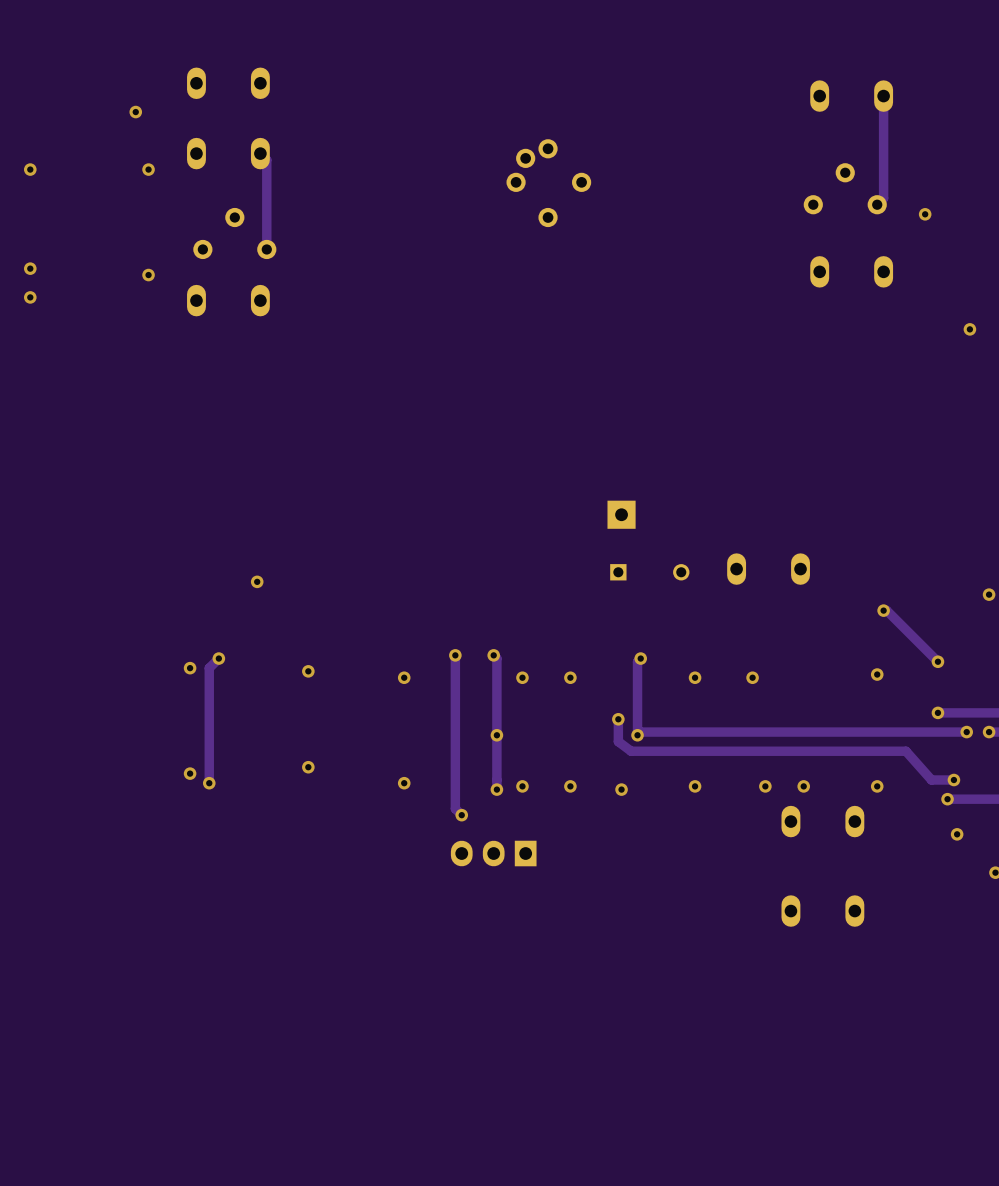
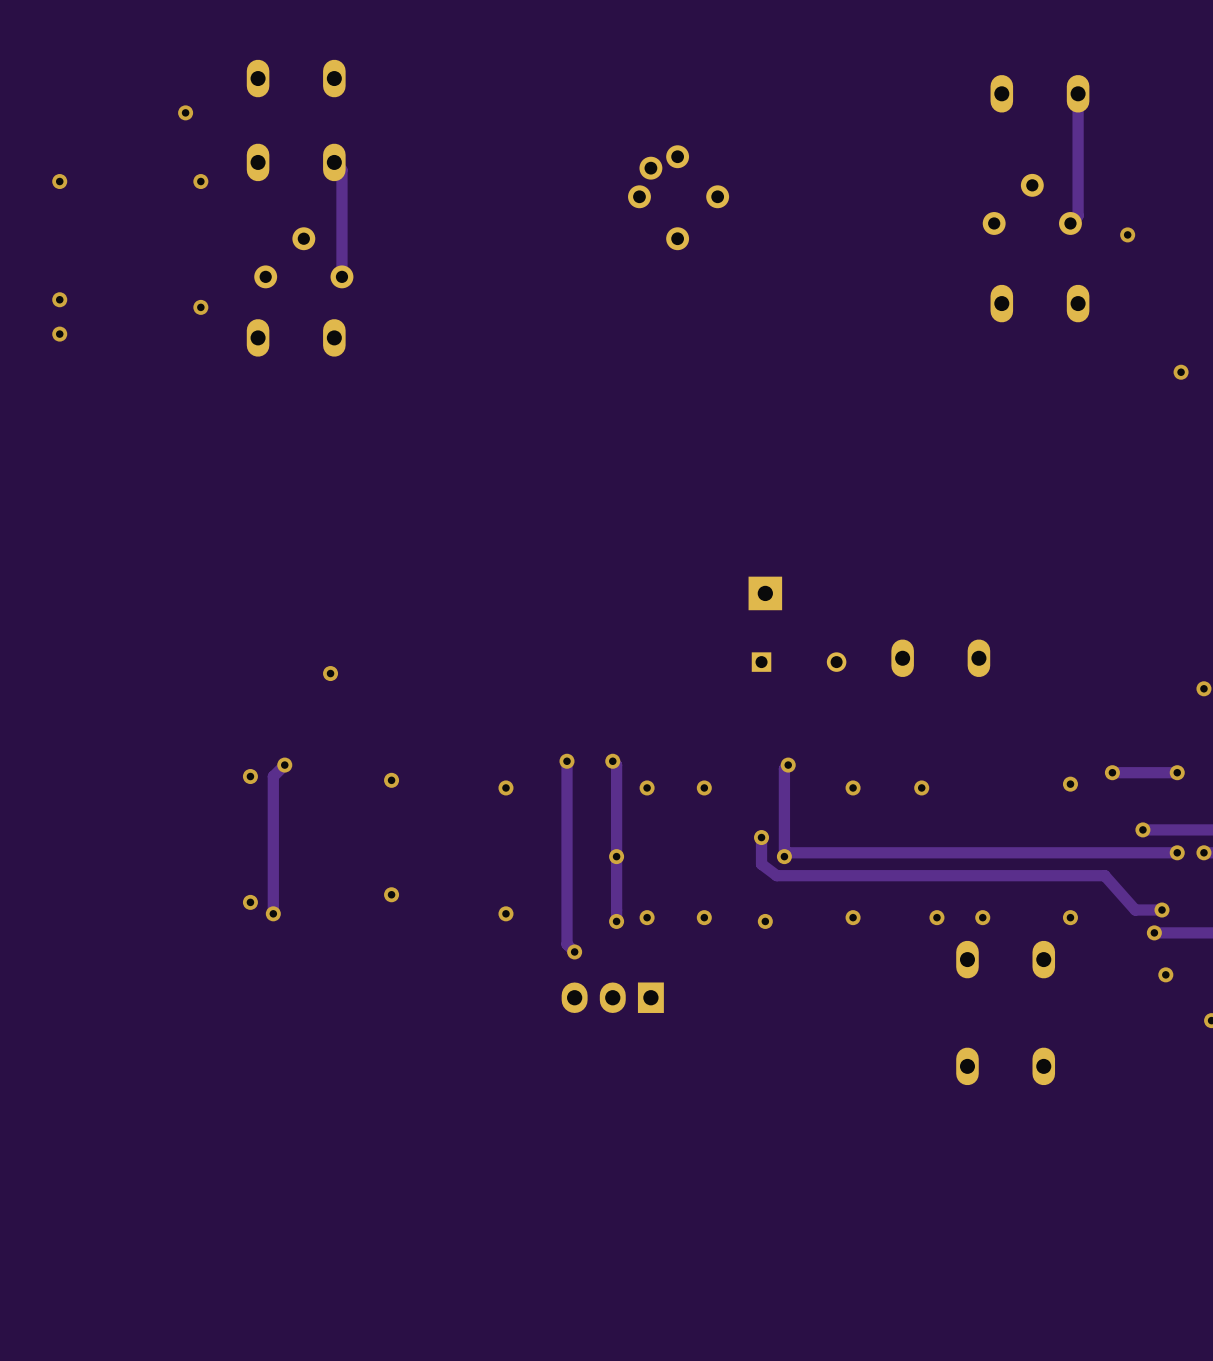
track: (883, 610) (886, 610) (937, 661) -> none
via: (883, 610) -> none
via: (937, 661) -> none
via: none -> (1112, 772)
track: none -> (1177, 772) (1112, 772)
via: none -> (1177, 772)

